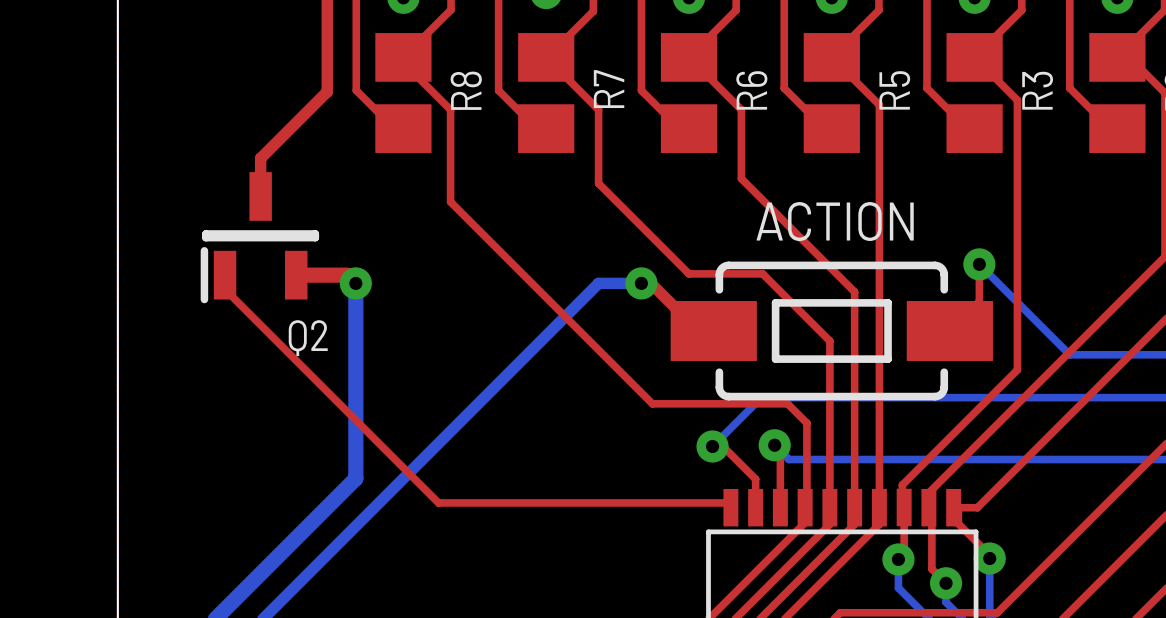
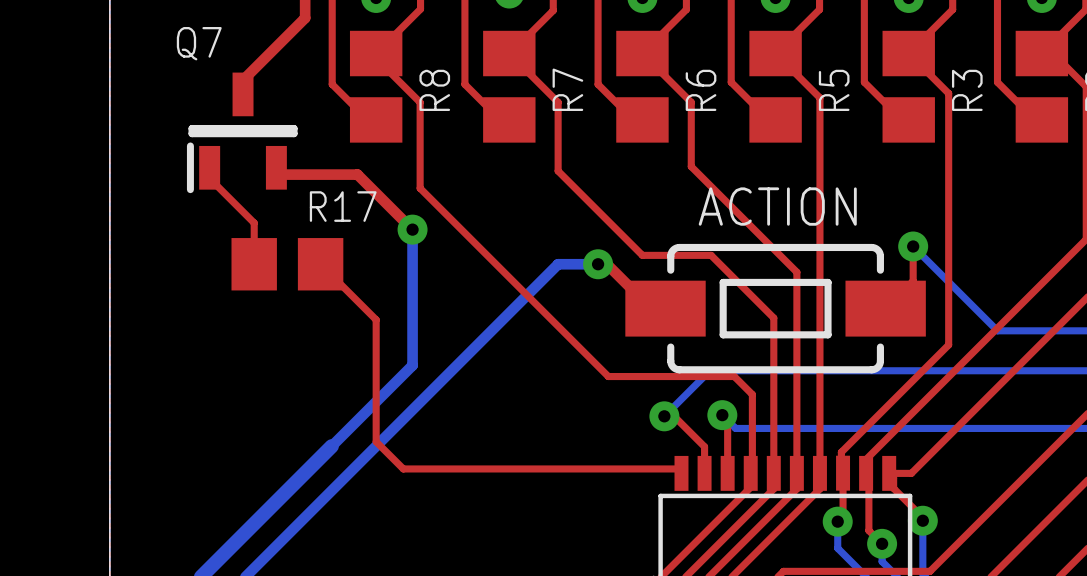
top track: (327, 19) (327, 91) (260, 158) (260, 196) -> (305, 18) (243, 80) (243, 94)
Q7: none -> (242, 132)
top track: none -> (209, 167) (209, 178) (254, 223) (254, 264)
top track: none -> (276, 167) (283, 174) (357, 174) (412, 229)
Q2: (259, 237) -> none
top track: (225, 275) (225, 289) (438, 502) -> (320, 264) (376, 319) (376, 441) (403, 468) (408, 468)
top track: (296, 275) (347, 275) (355, 283) -> none
R17: none -> (287, 264)
bottom track: (355, 283) (355, 478) -> (412, 229) (412, 365) (331, 446)
via position: (355, 283) -> (412, 229)

